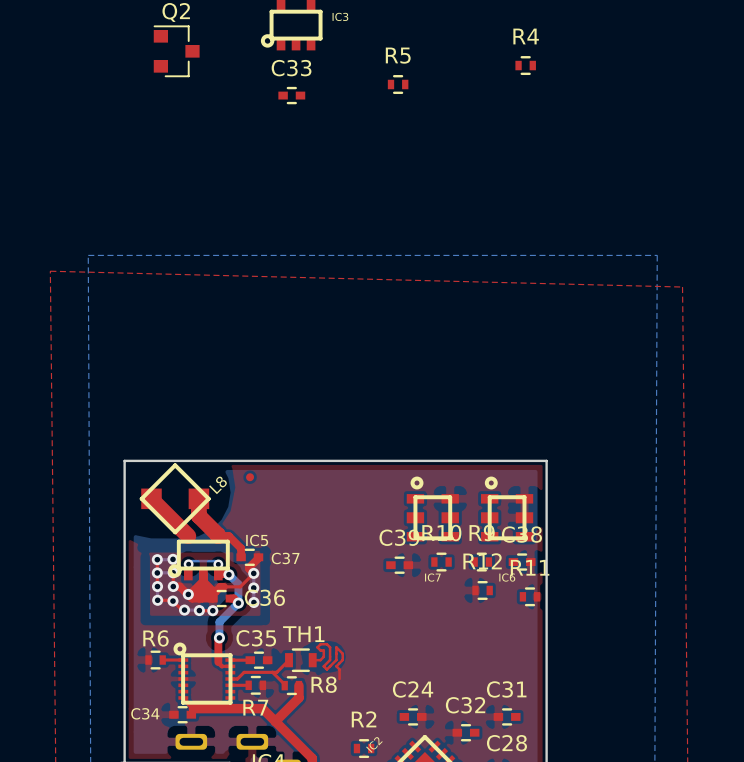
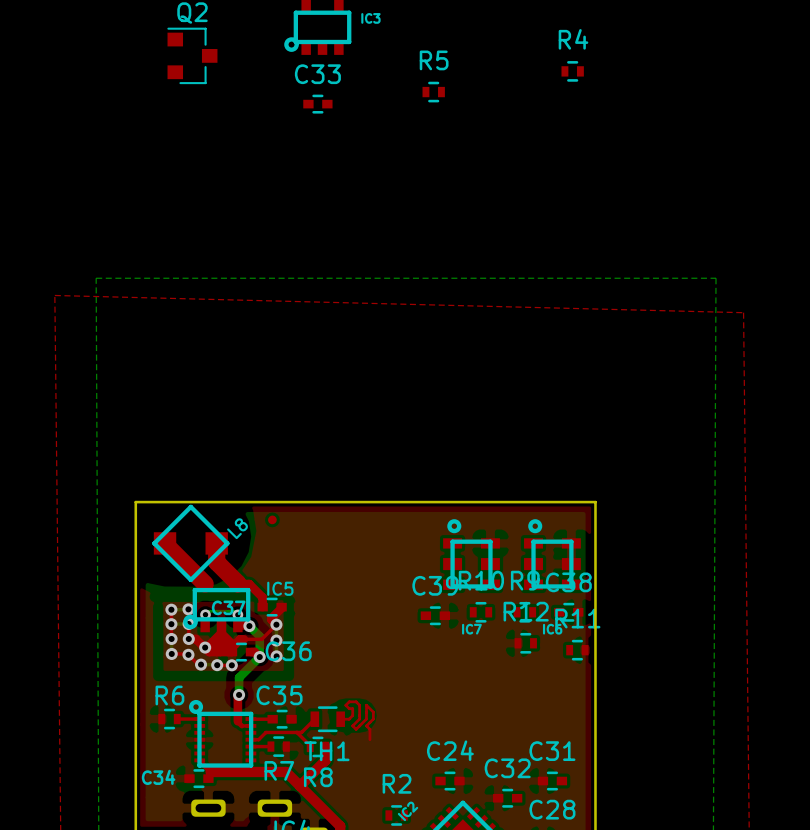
C37 name position: C37 (285, 558) -> C37 (228, 607)
TH1 name position: TH1 (303, 634) -> TH1 (326, 751)
R8 name position: R8 (324, 684) -> R8 (318, 777)

